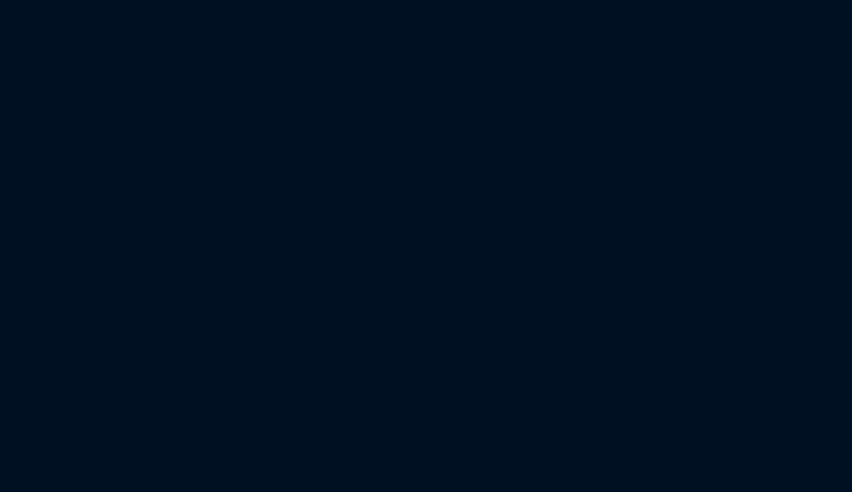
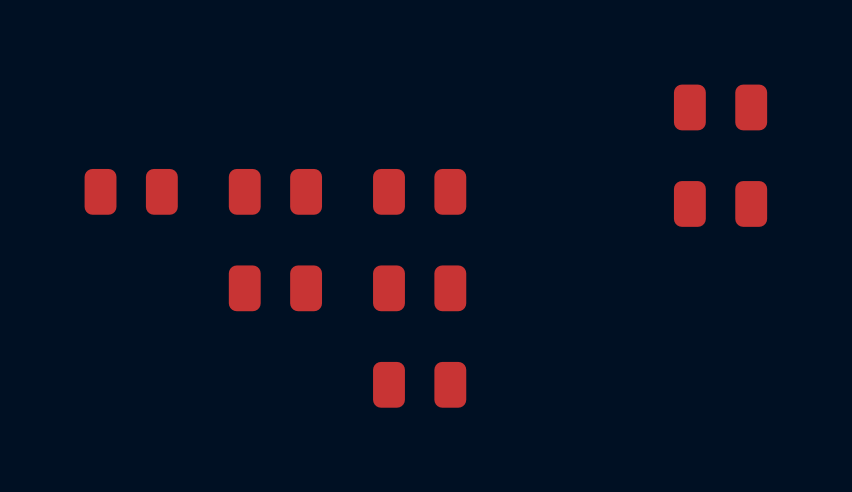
part: none -> (720, 107)
part: none -> (131, 191)
part: none -> (275, 191)
part: none -> (419, 191)
part: none -> (720, 203)
part: none -> (275, 288)
part: none -> (419, 288)
part: none -> (419, 384)

